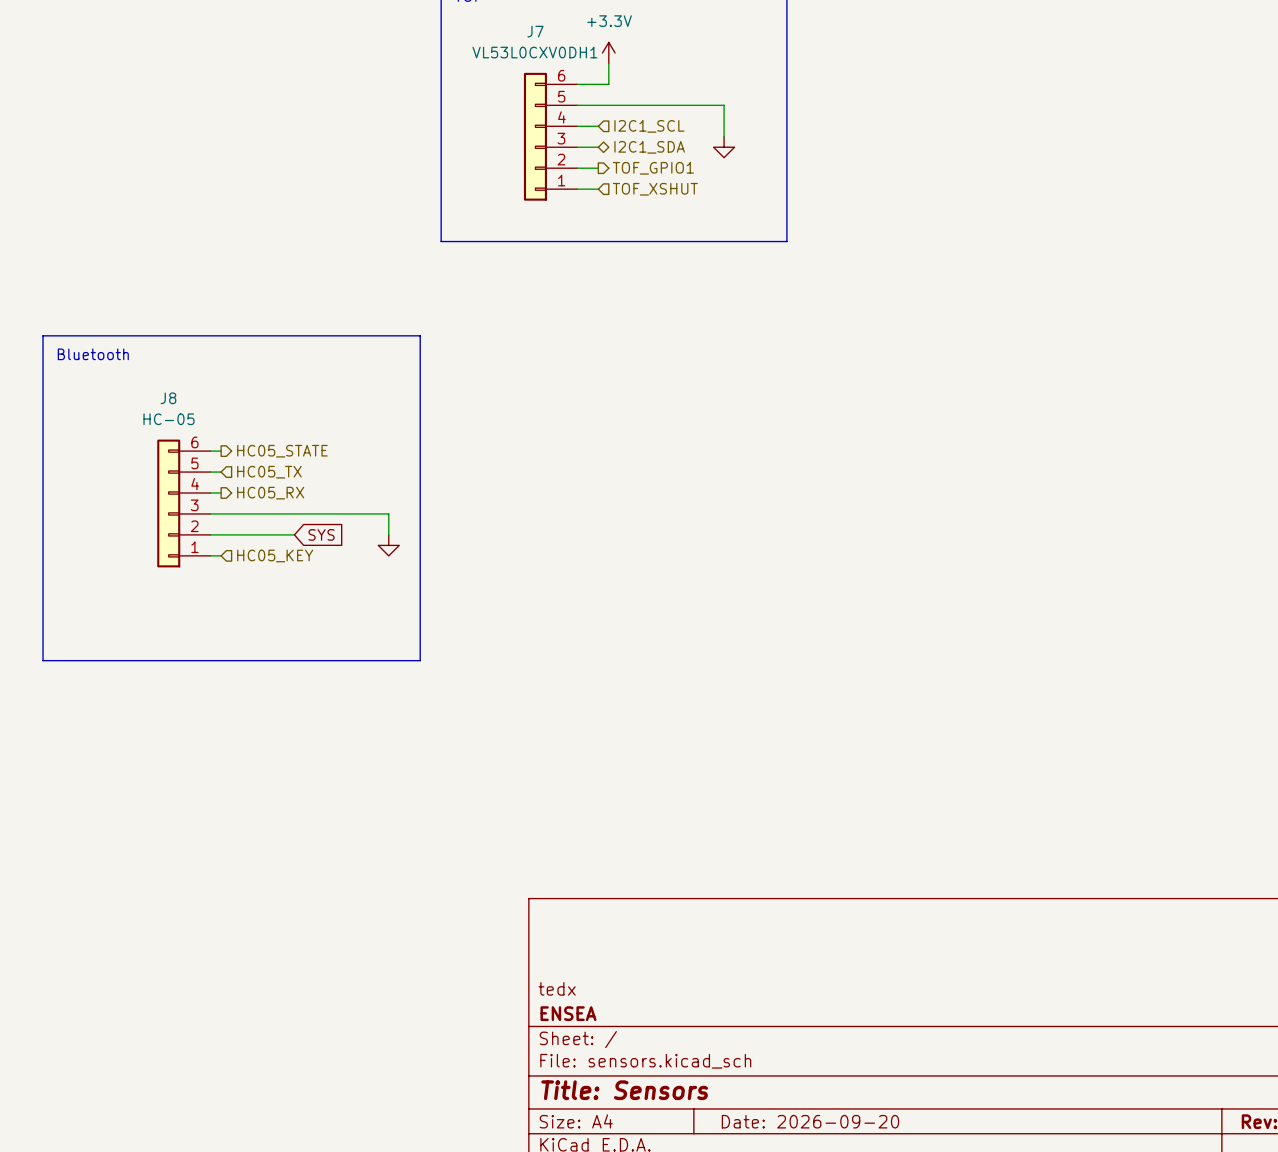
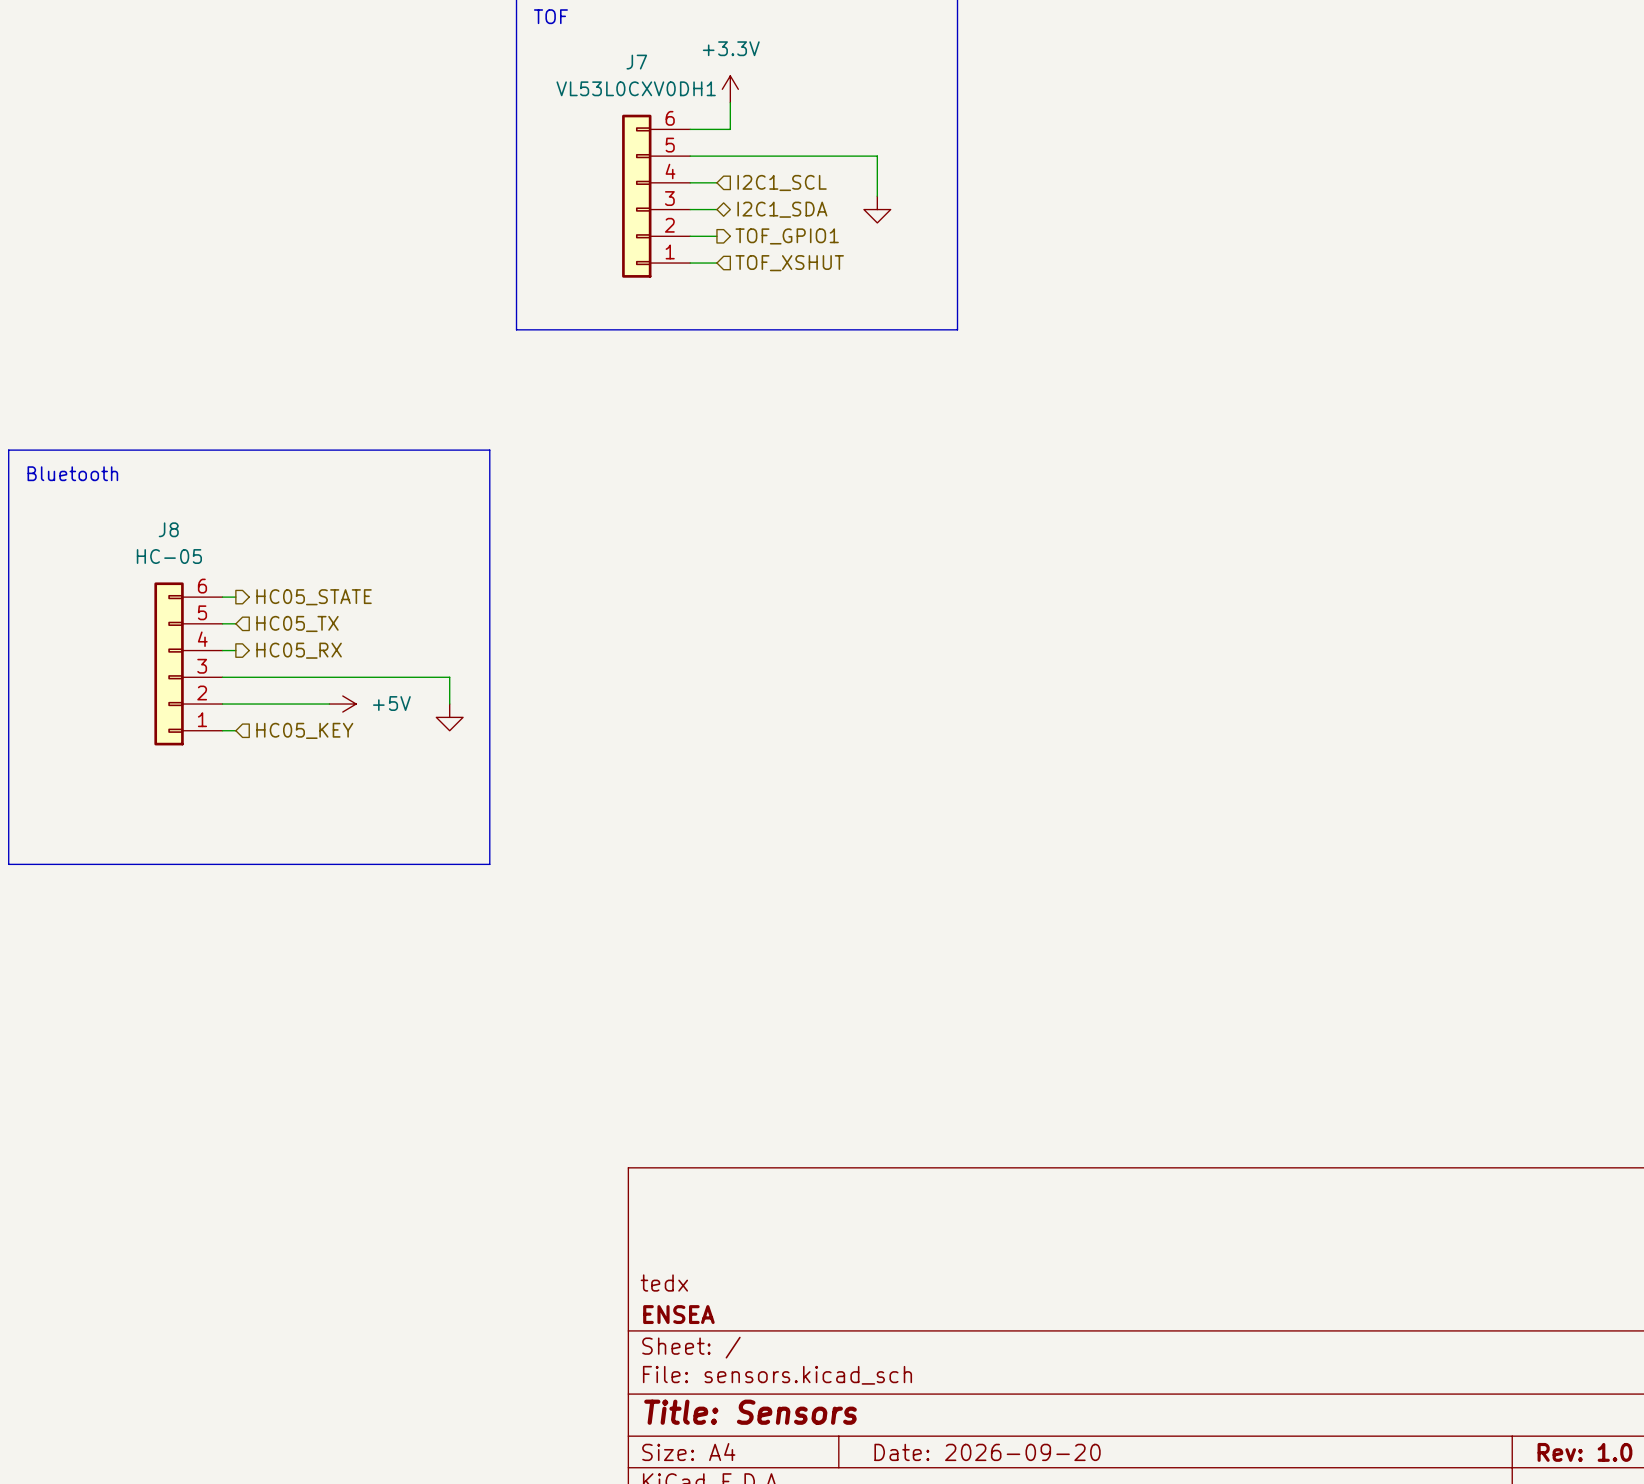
power symbol: none -> +5V (342, 704)
global label: SYS (321, 534) -> none

